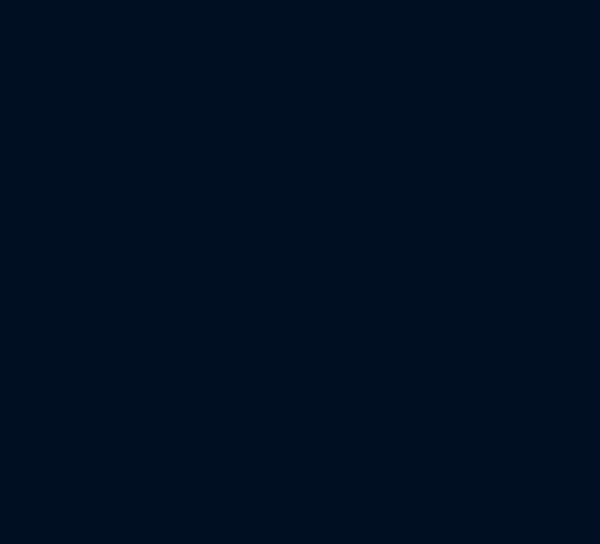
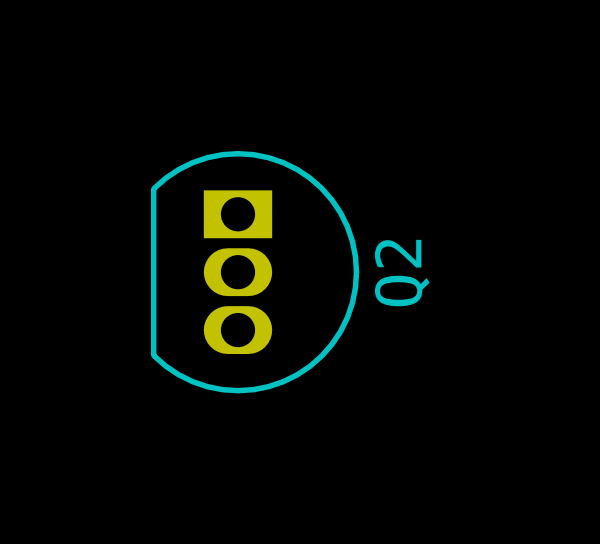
Q2: none -> (255, 272)

